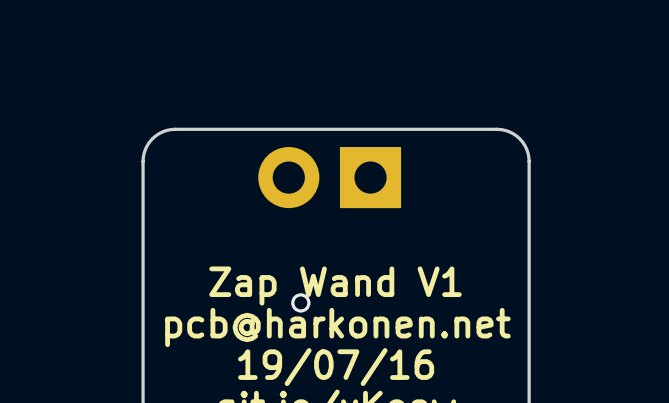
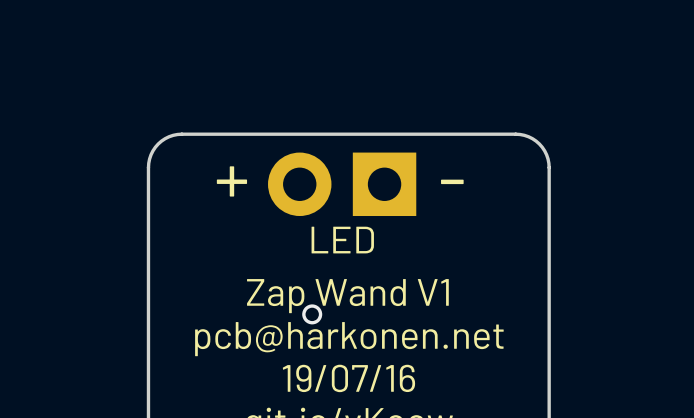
text: none -> + (231, 181)
text: none -> - (452, 181)
text: none -> LED (342, 240)

